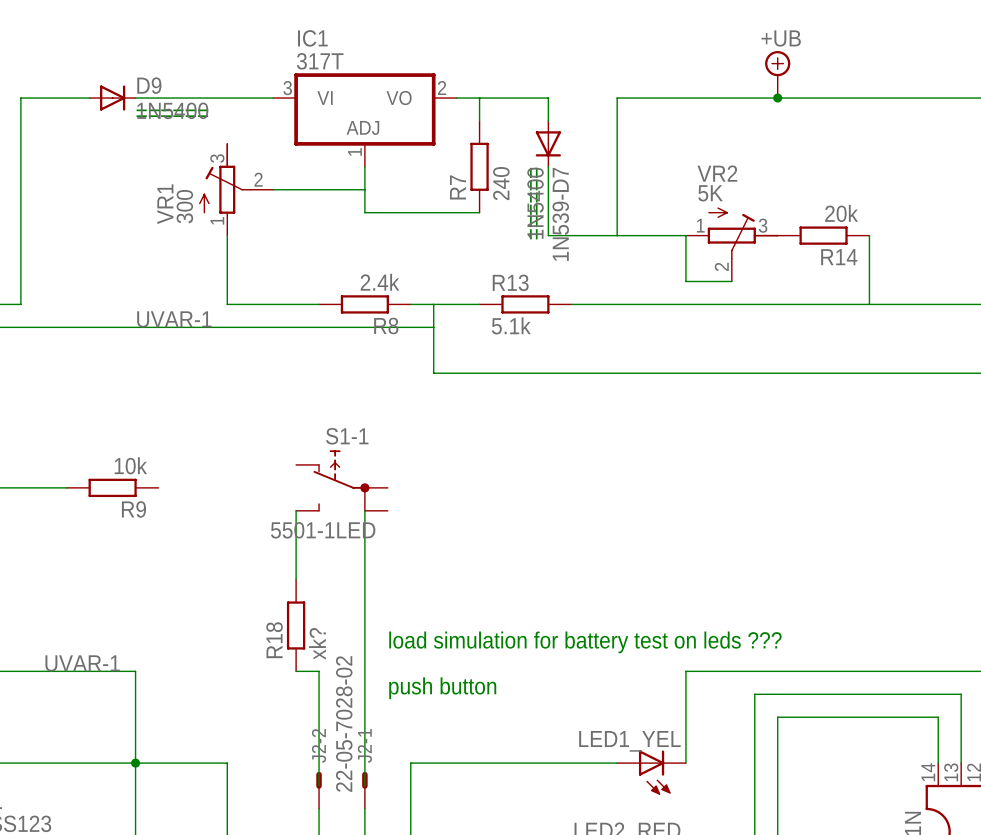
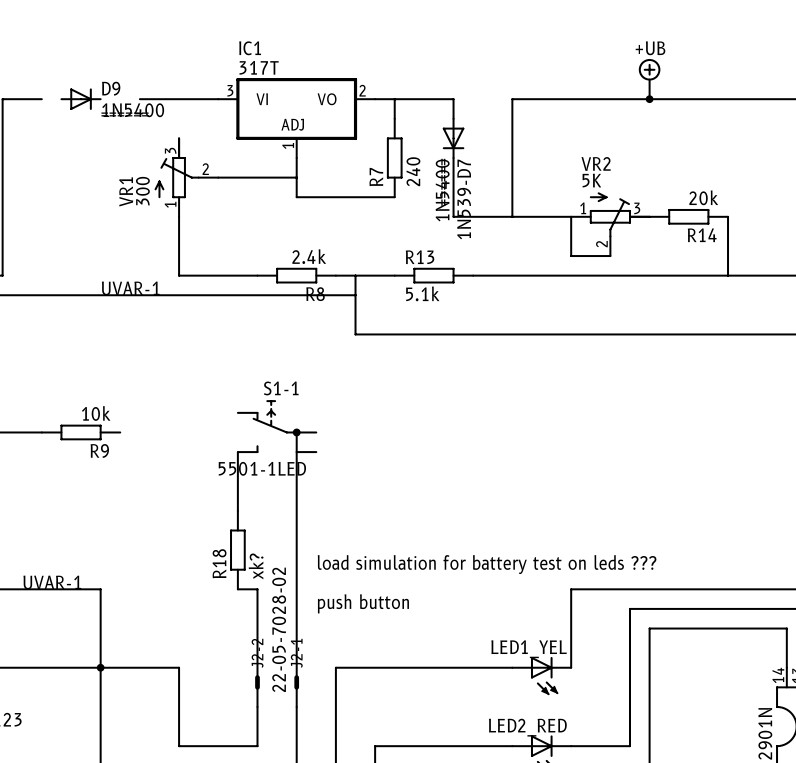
wire: (66, 98) (89, 98) -> none
wire: (135, 98) (181, 98) -> none

